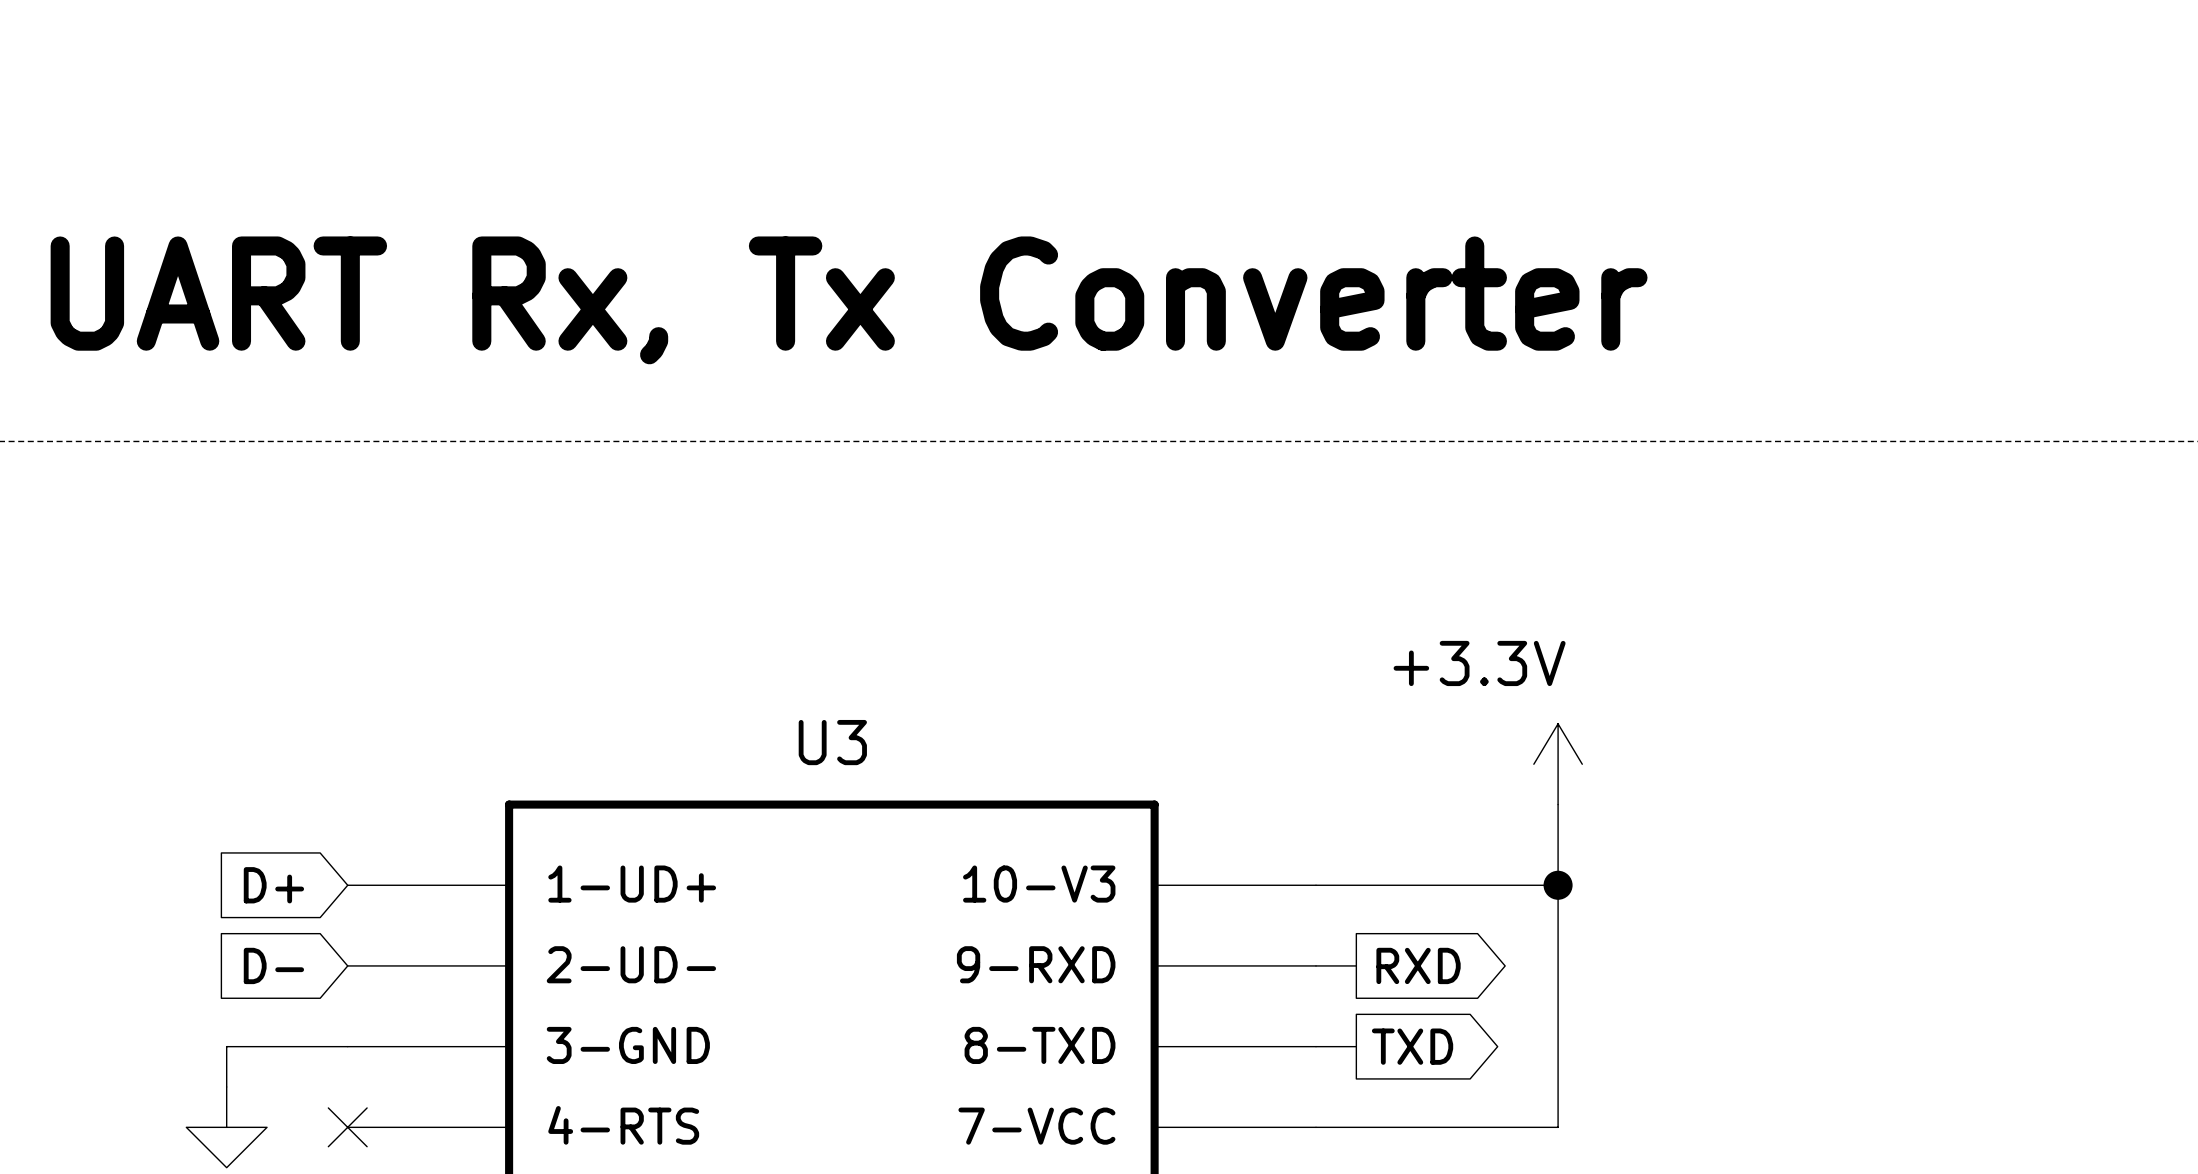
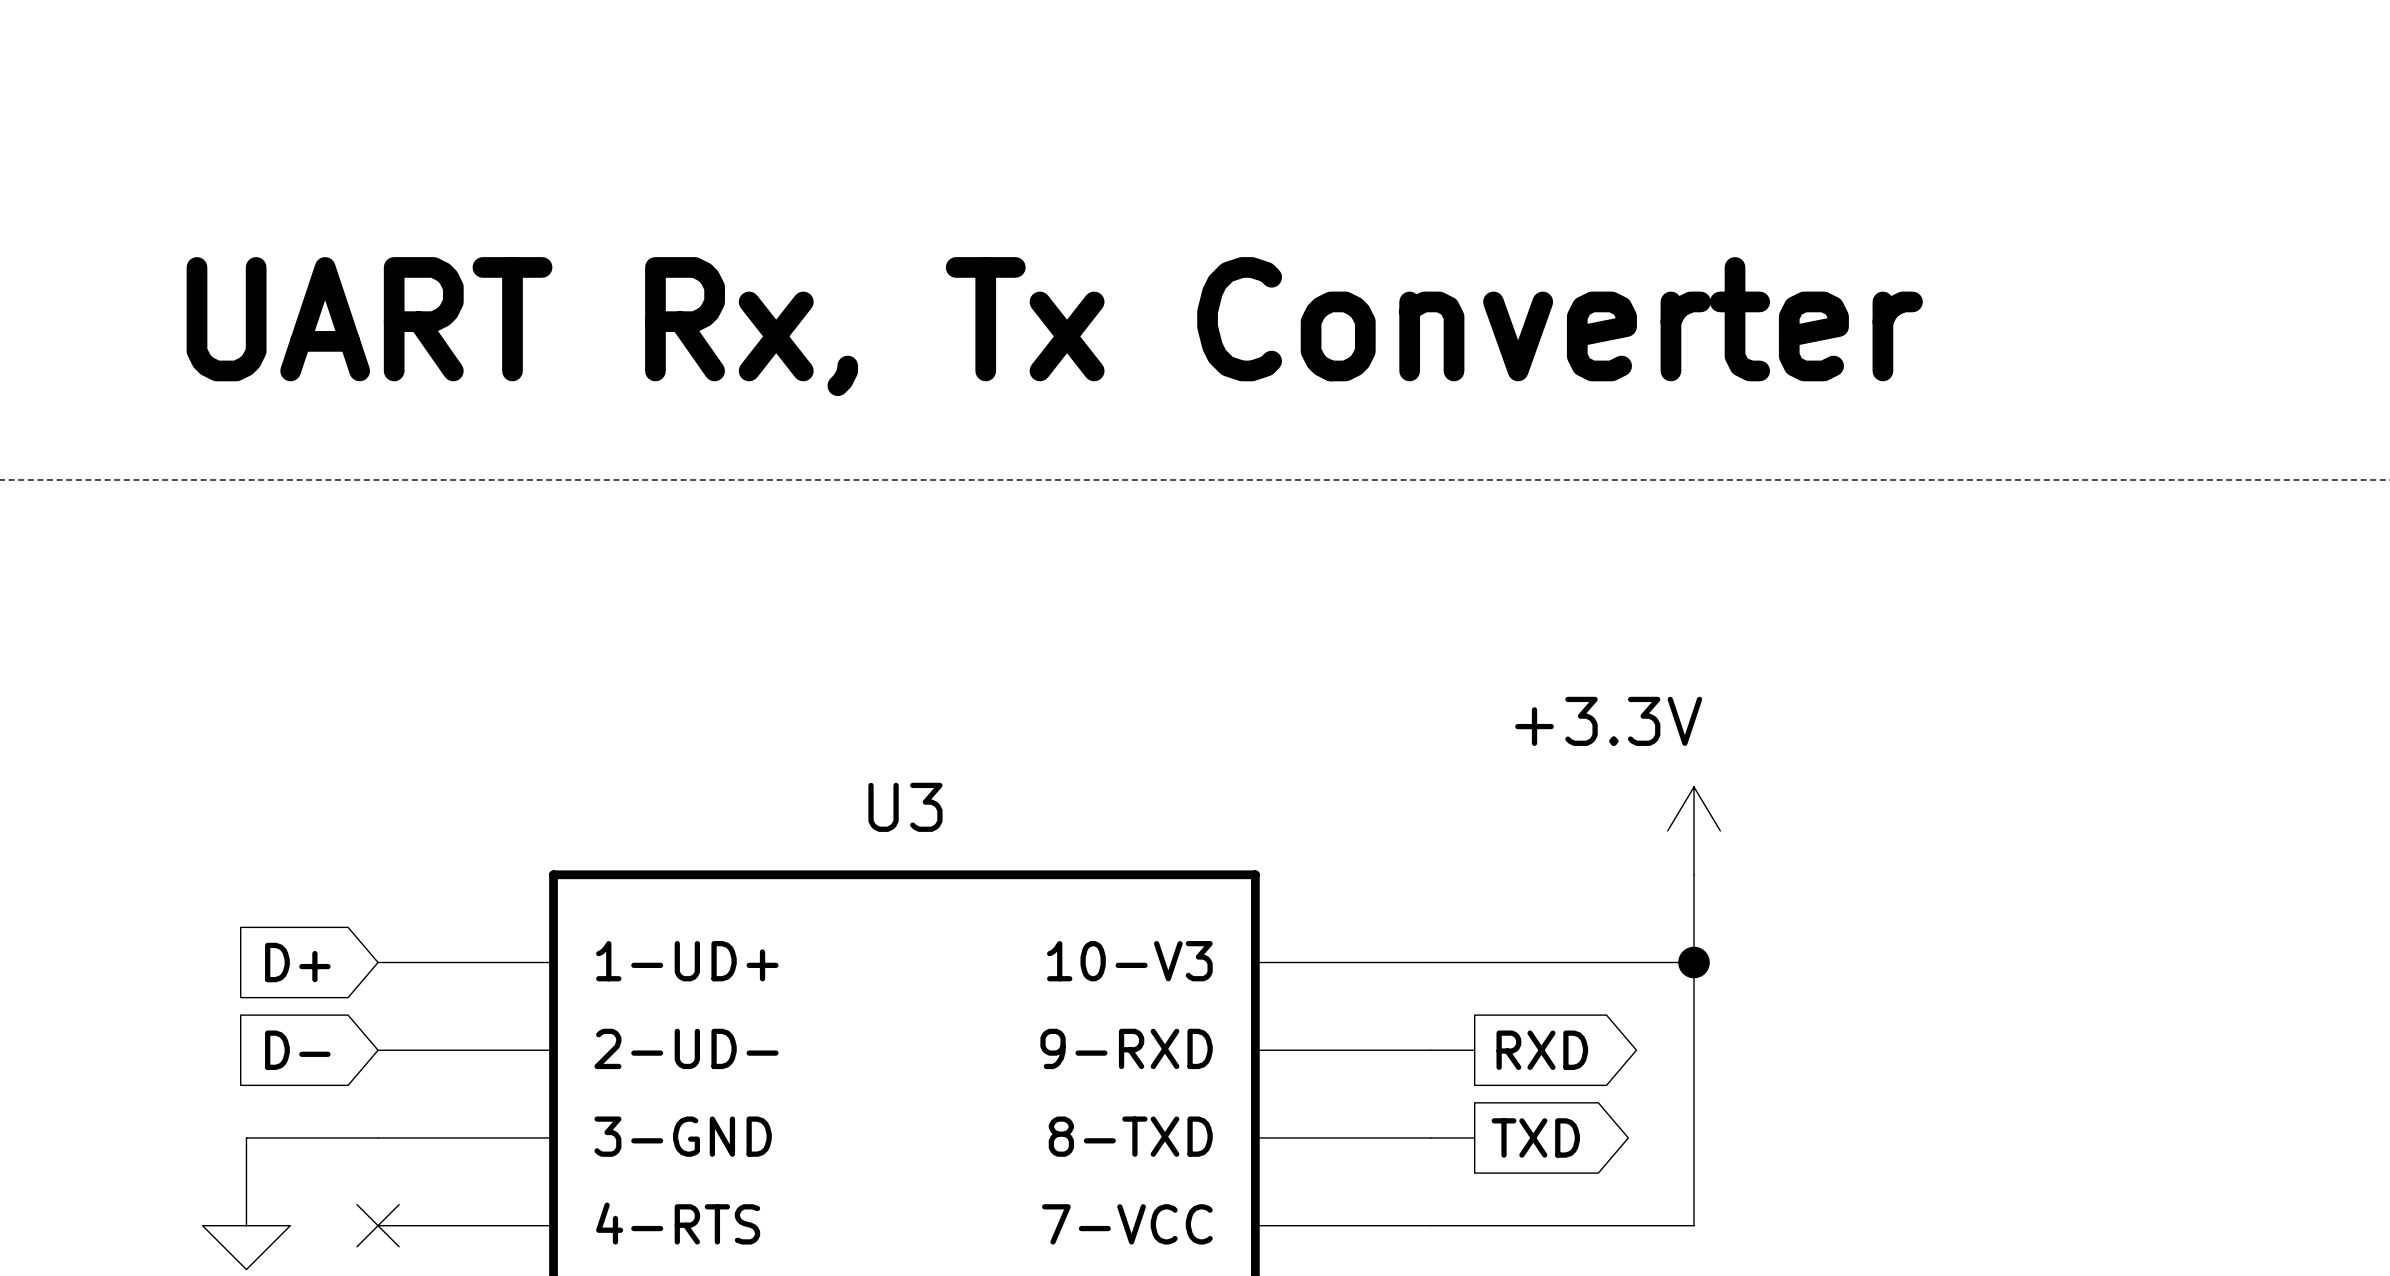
text position: UART Rx, Tx Converter (849, 300) -> UART Rx, Tx Converter (1054, 326)

